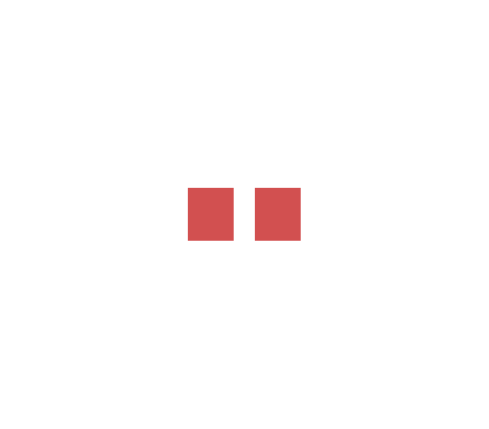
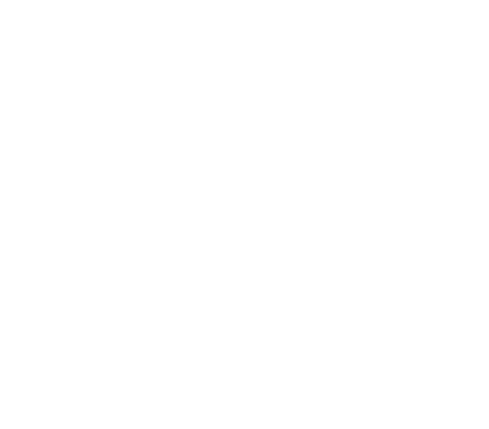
part: (244, 214) -> none

